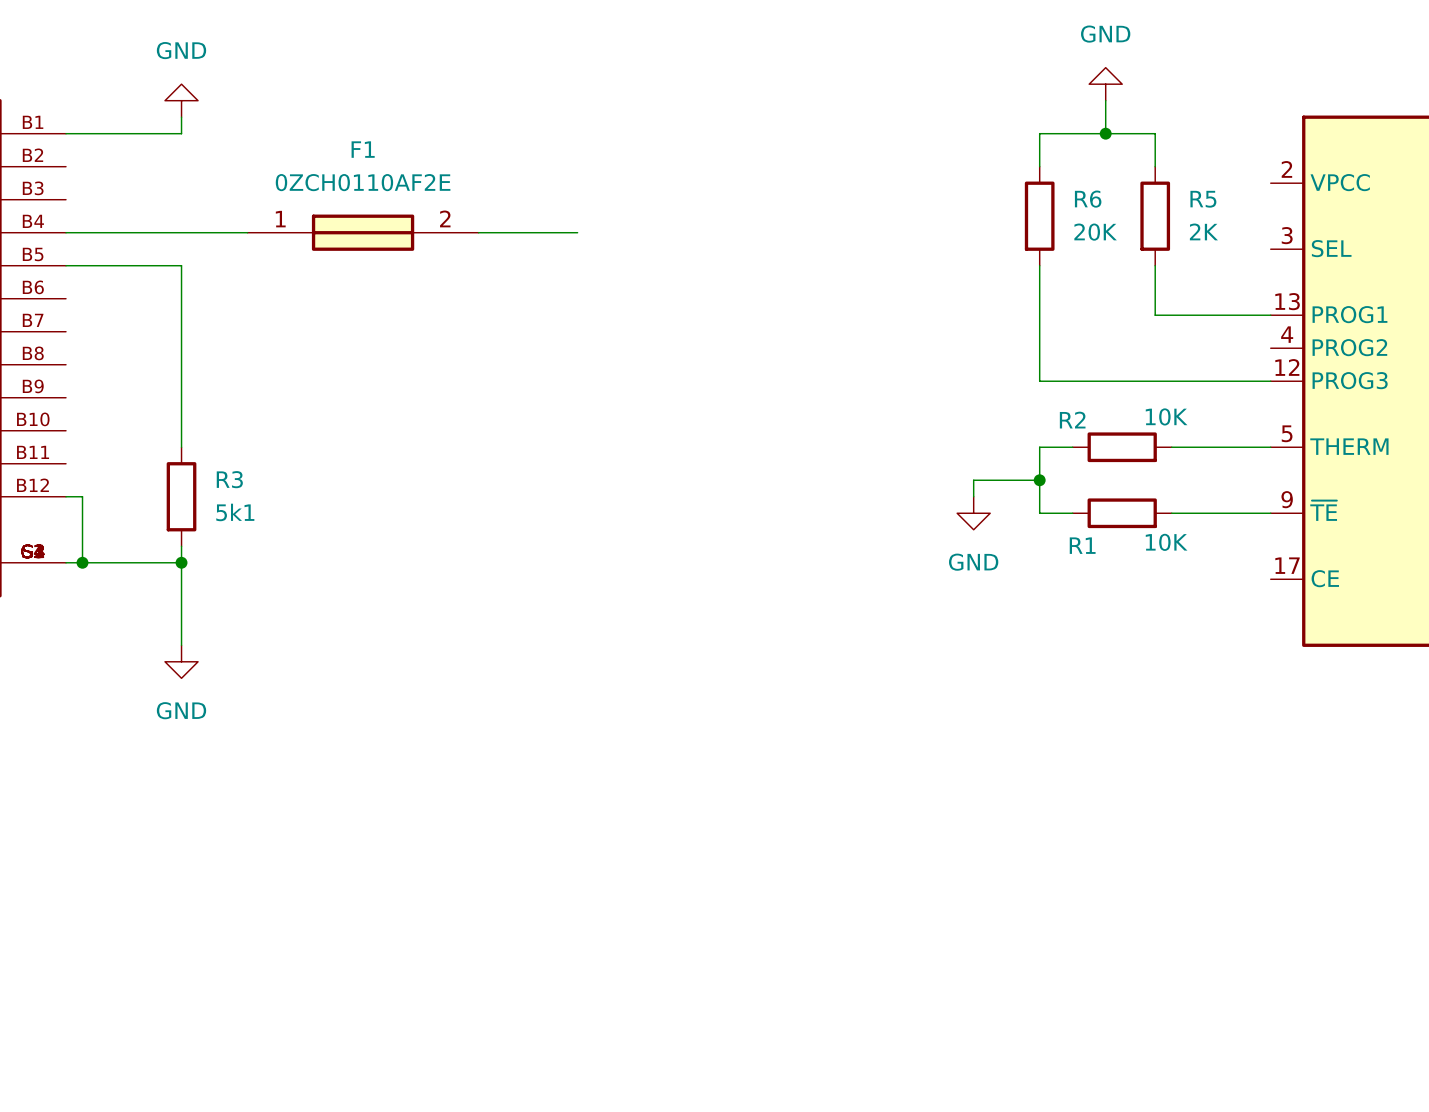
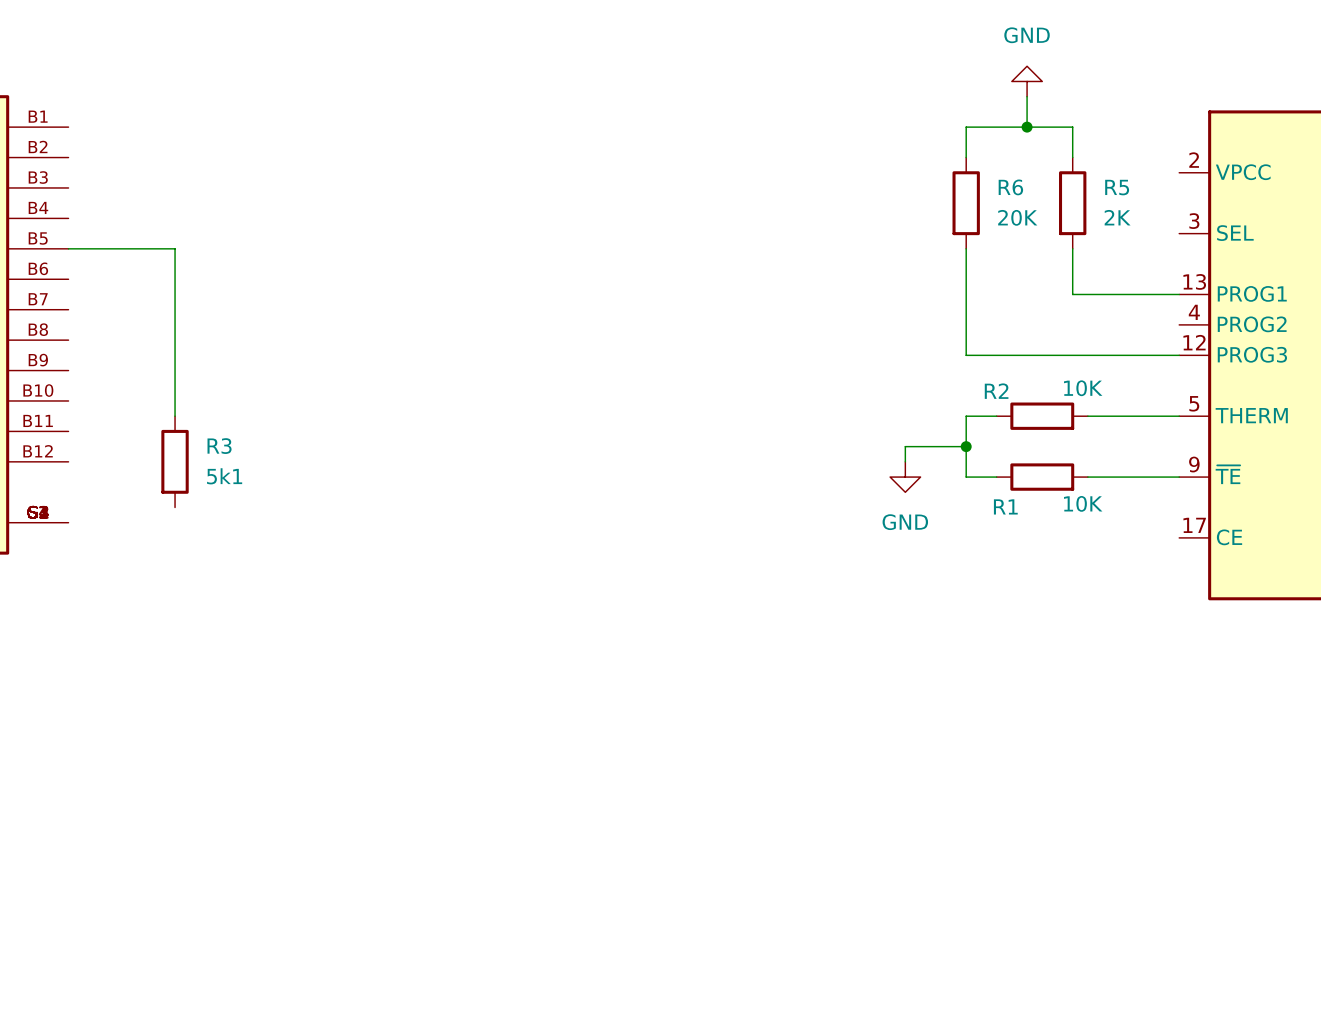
power symbol: GND (181, 100) -> none
wire: (181, 117) (181, 133) (66, 133) -> none
wire: (66, 232) (247, 232) -> none
F1: 0ZCH0110AF2E (363, 232) -> none
wire: (478, 232) (577, 232) -> none
wire: (66, 496) (82, 496) (82, 562) -> none
wire: (181, 546) (181, 645) -> none
wire: (66, 562) (181, 562) -> none
junction: (82, 562) -> none
junction: (181, 562) -> none
power symbol: GND (181, 661) -> none

